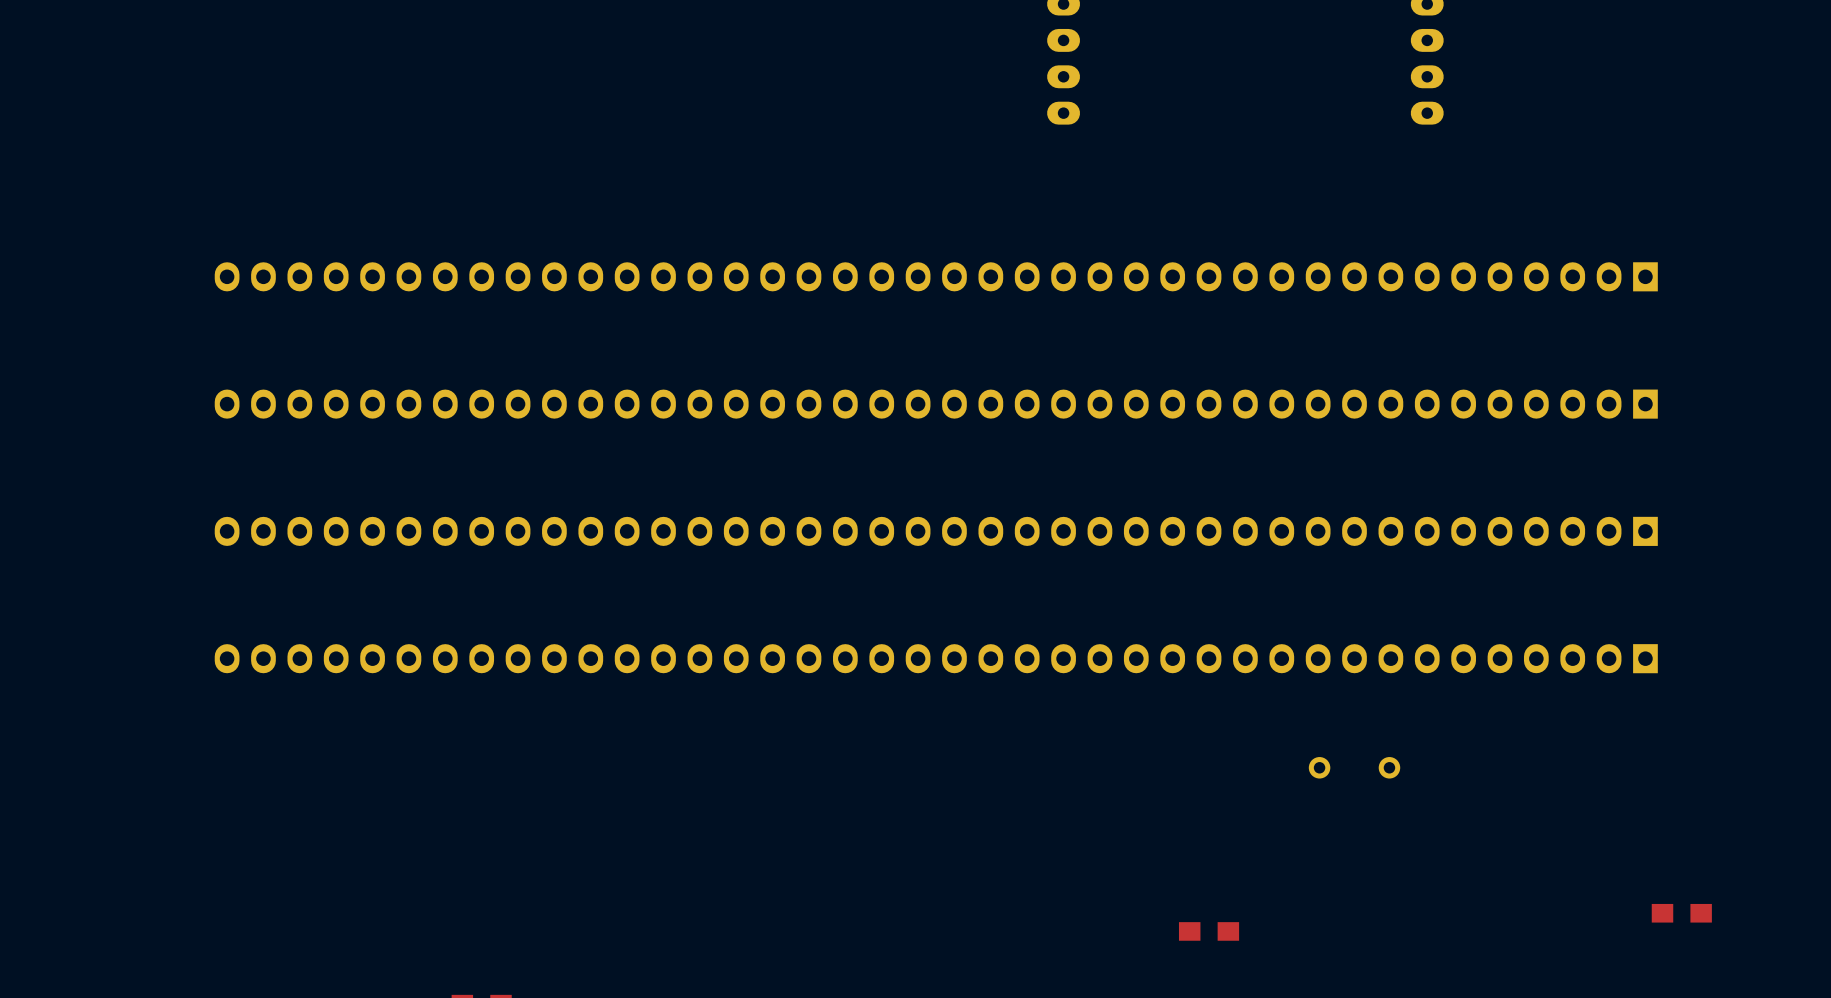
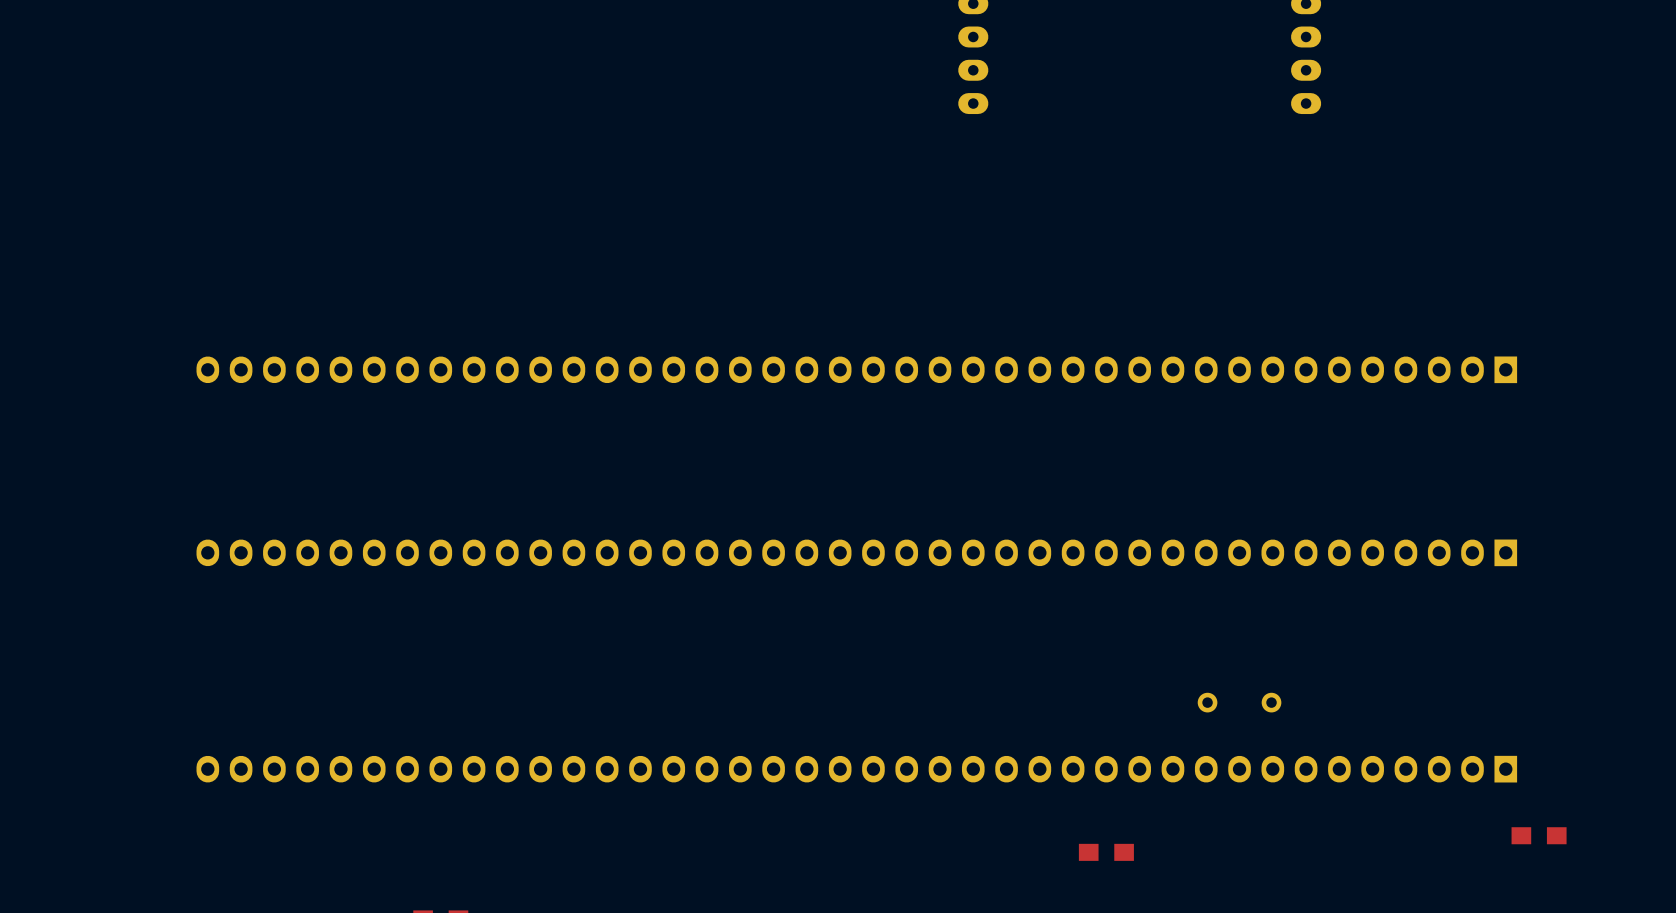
part: (936, 276) -> none
part: (936, 531) -> none
part: none -> (856, 552)
part: (936, 658) -> none
part: none -> (856, 769)

